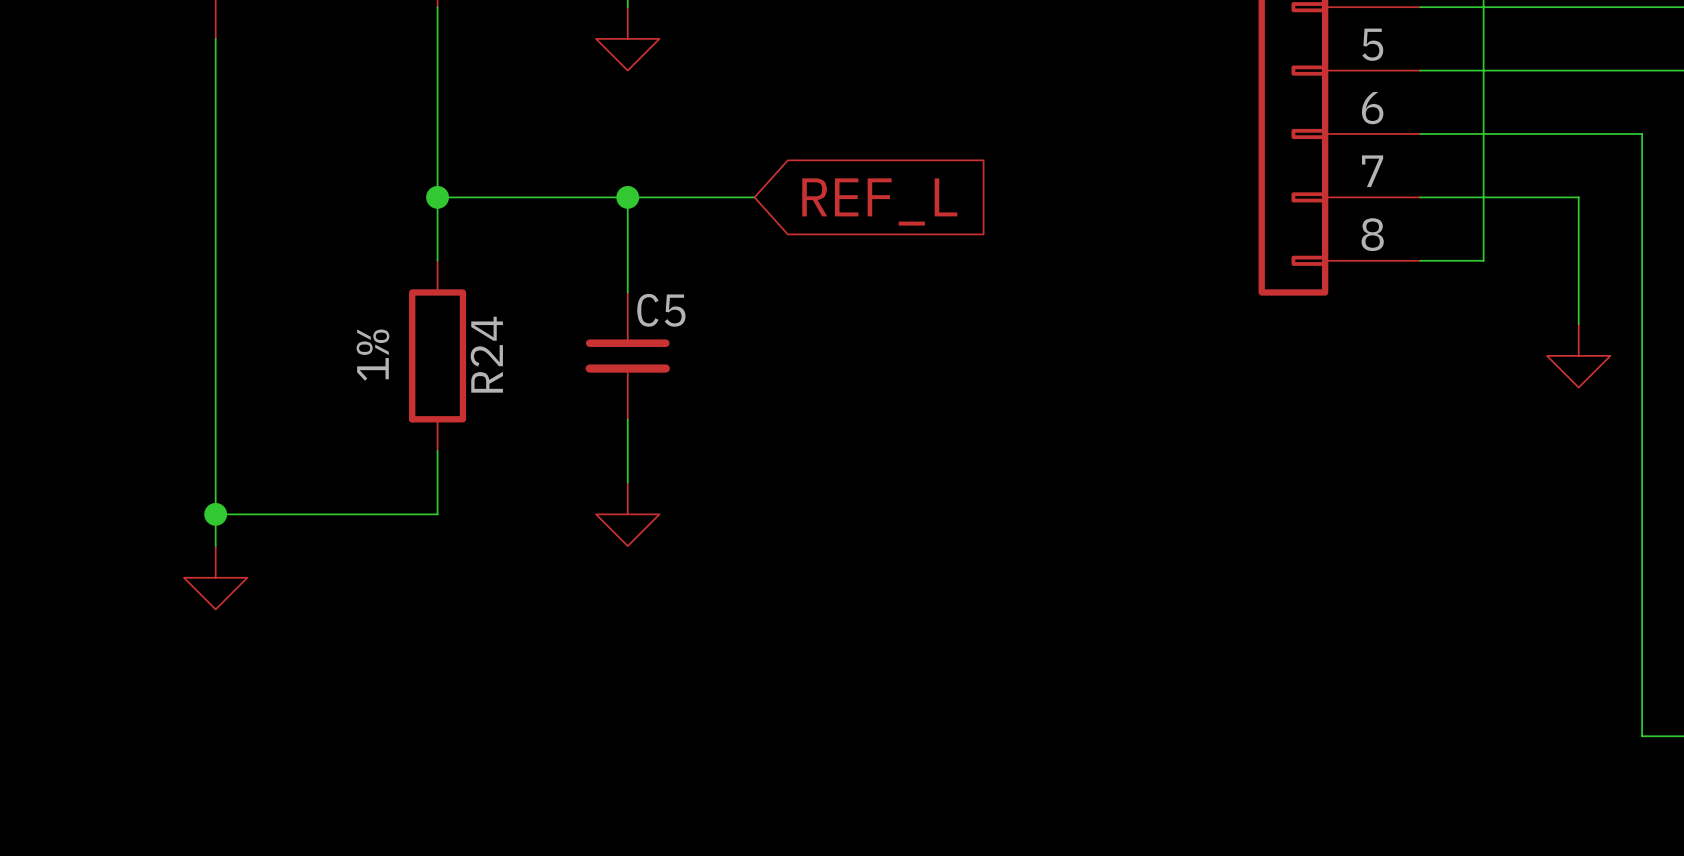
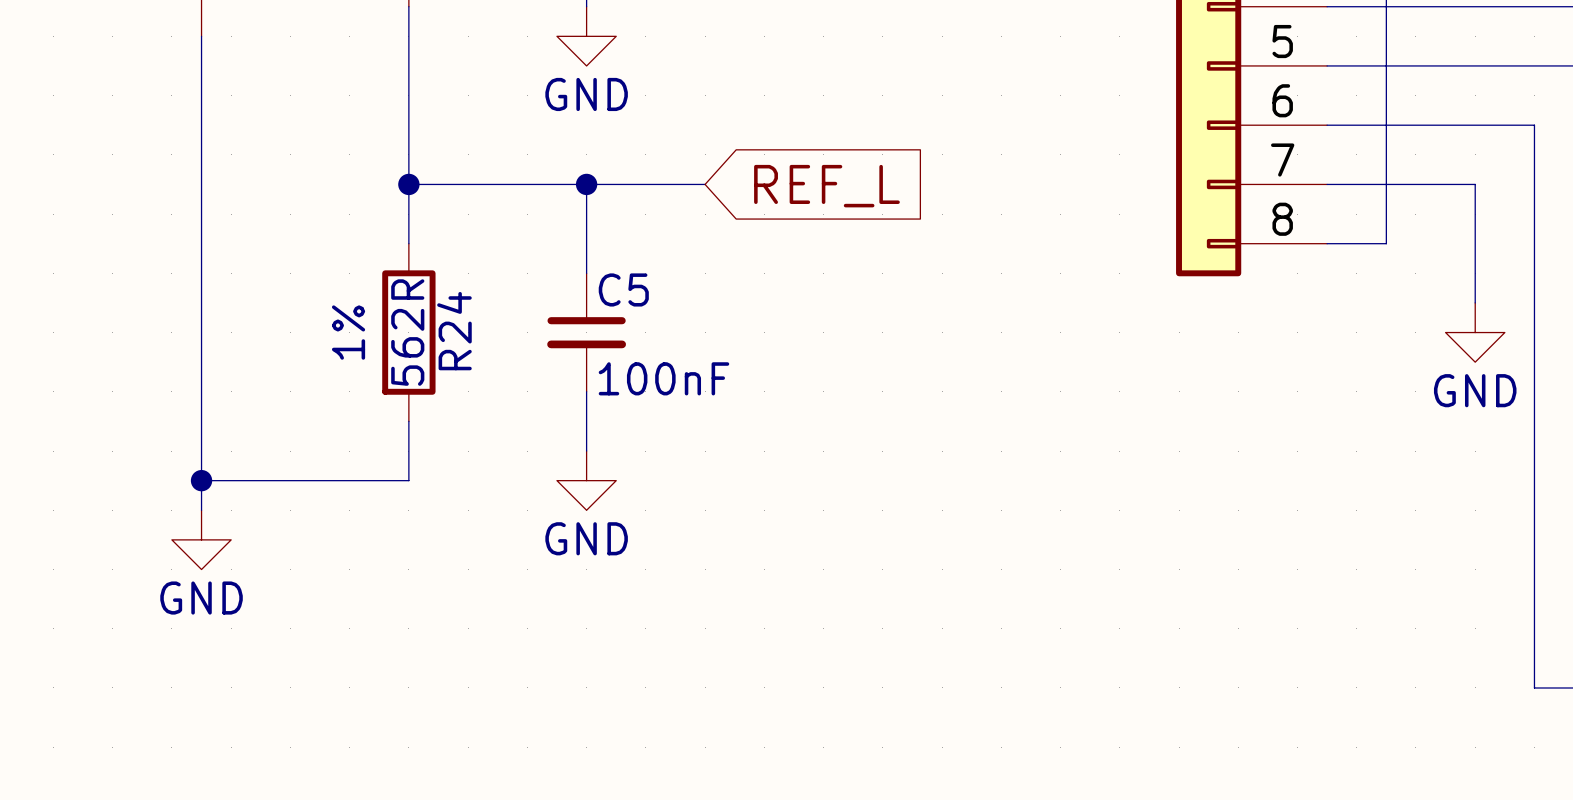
power symbol text: none -> GND (586, 94)
R24 value: none -> 562R (407, 332)
C5 value: none -> 100nF (663, 378)
power symbol text: none -> GND (1475, 390)
power symbol text: none -> GND (586, 538)
power symbol text: none -> GND (201, 598)

